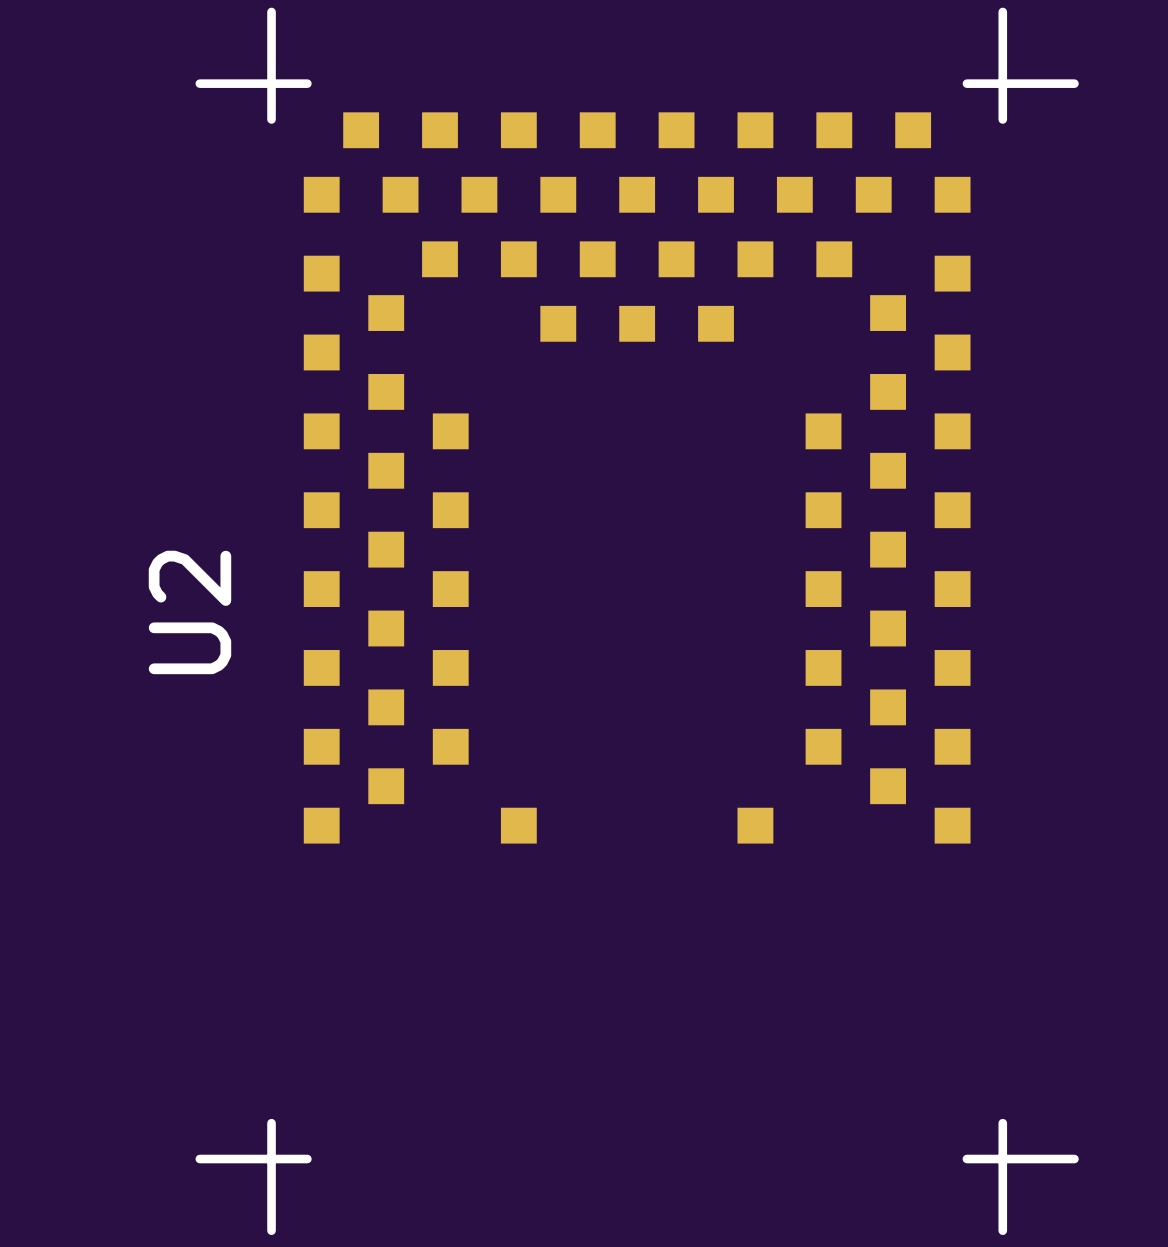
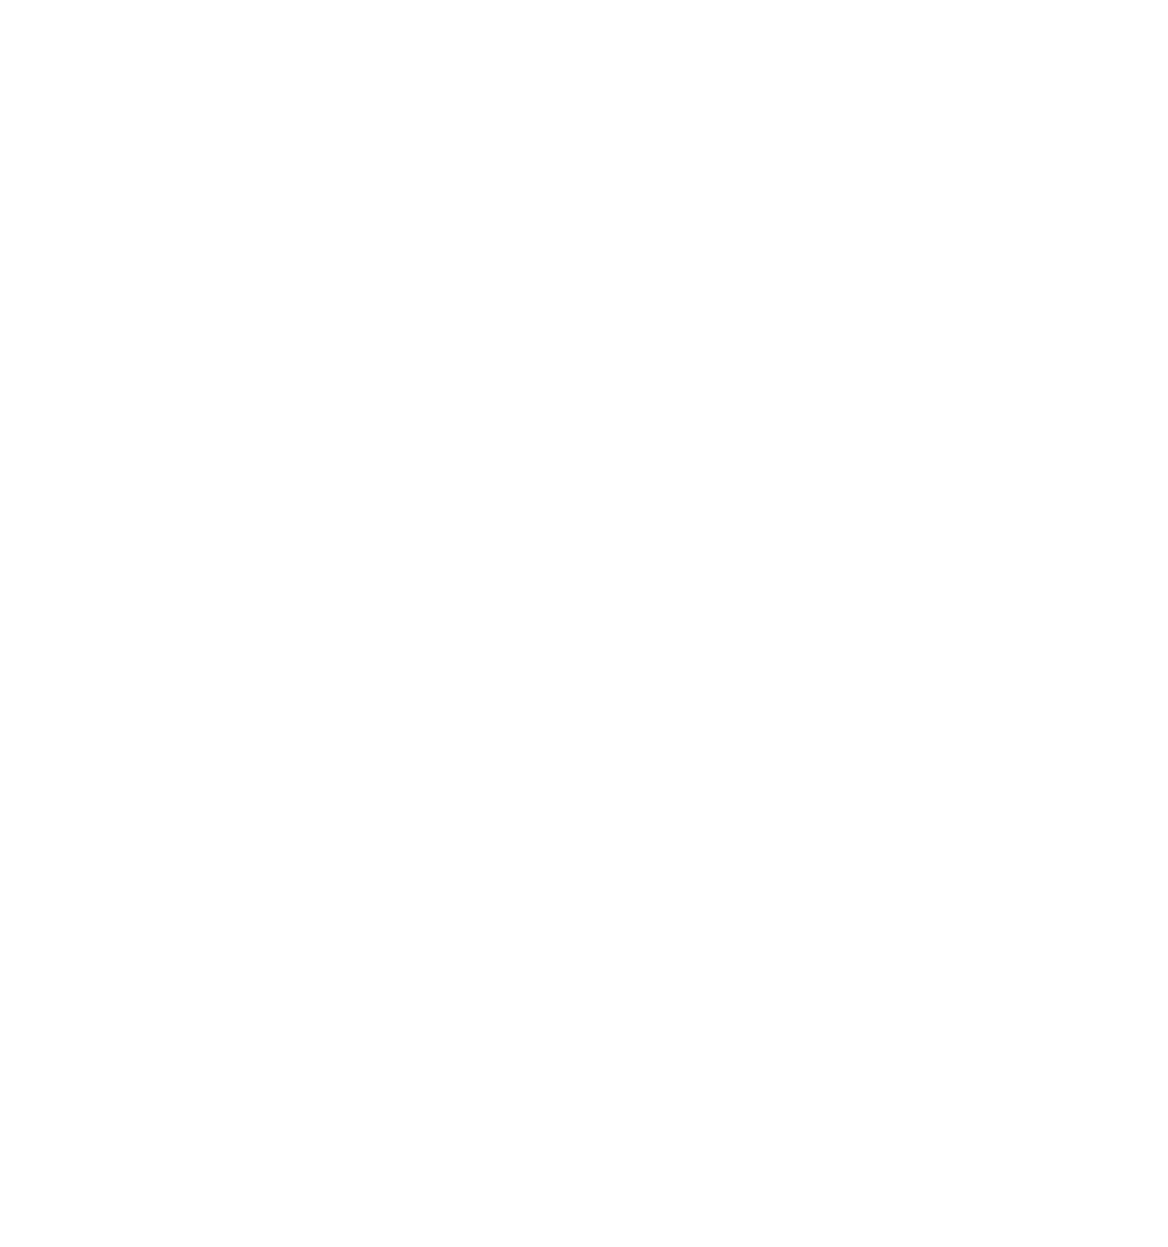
U2: (637, 621) -> none

